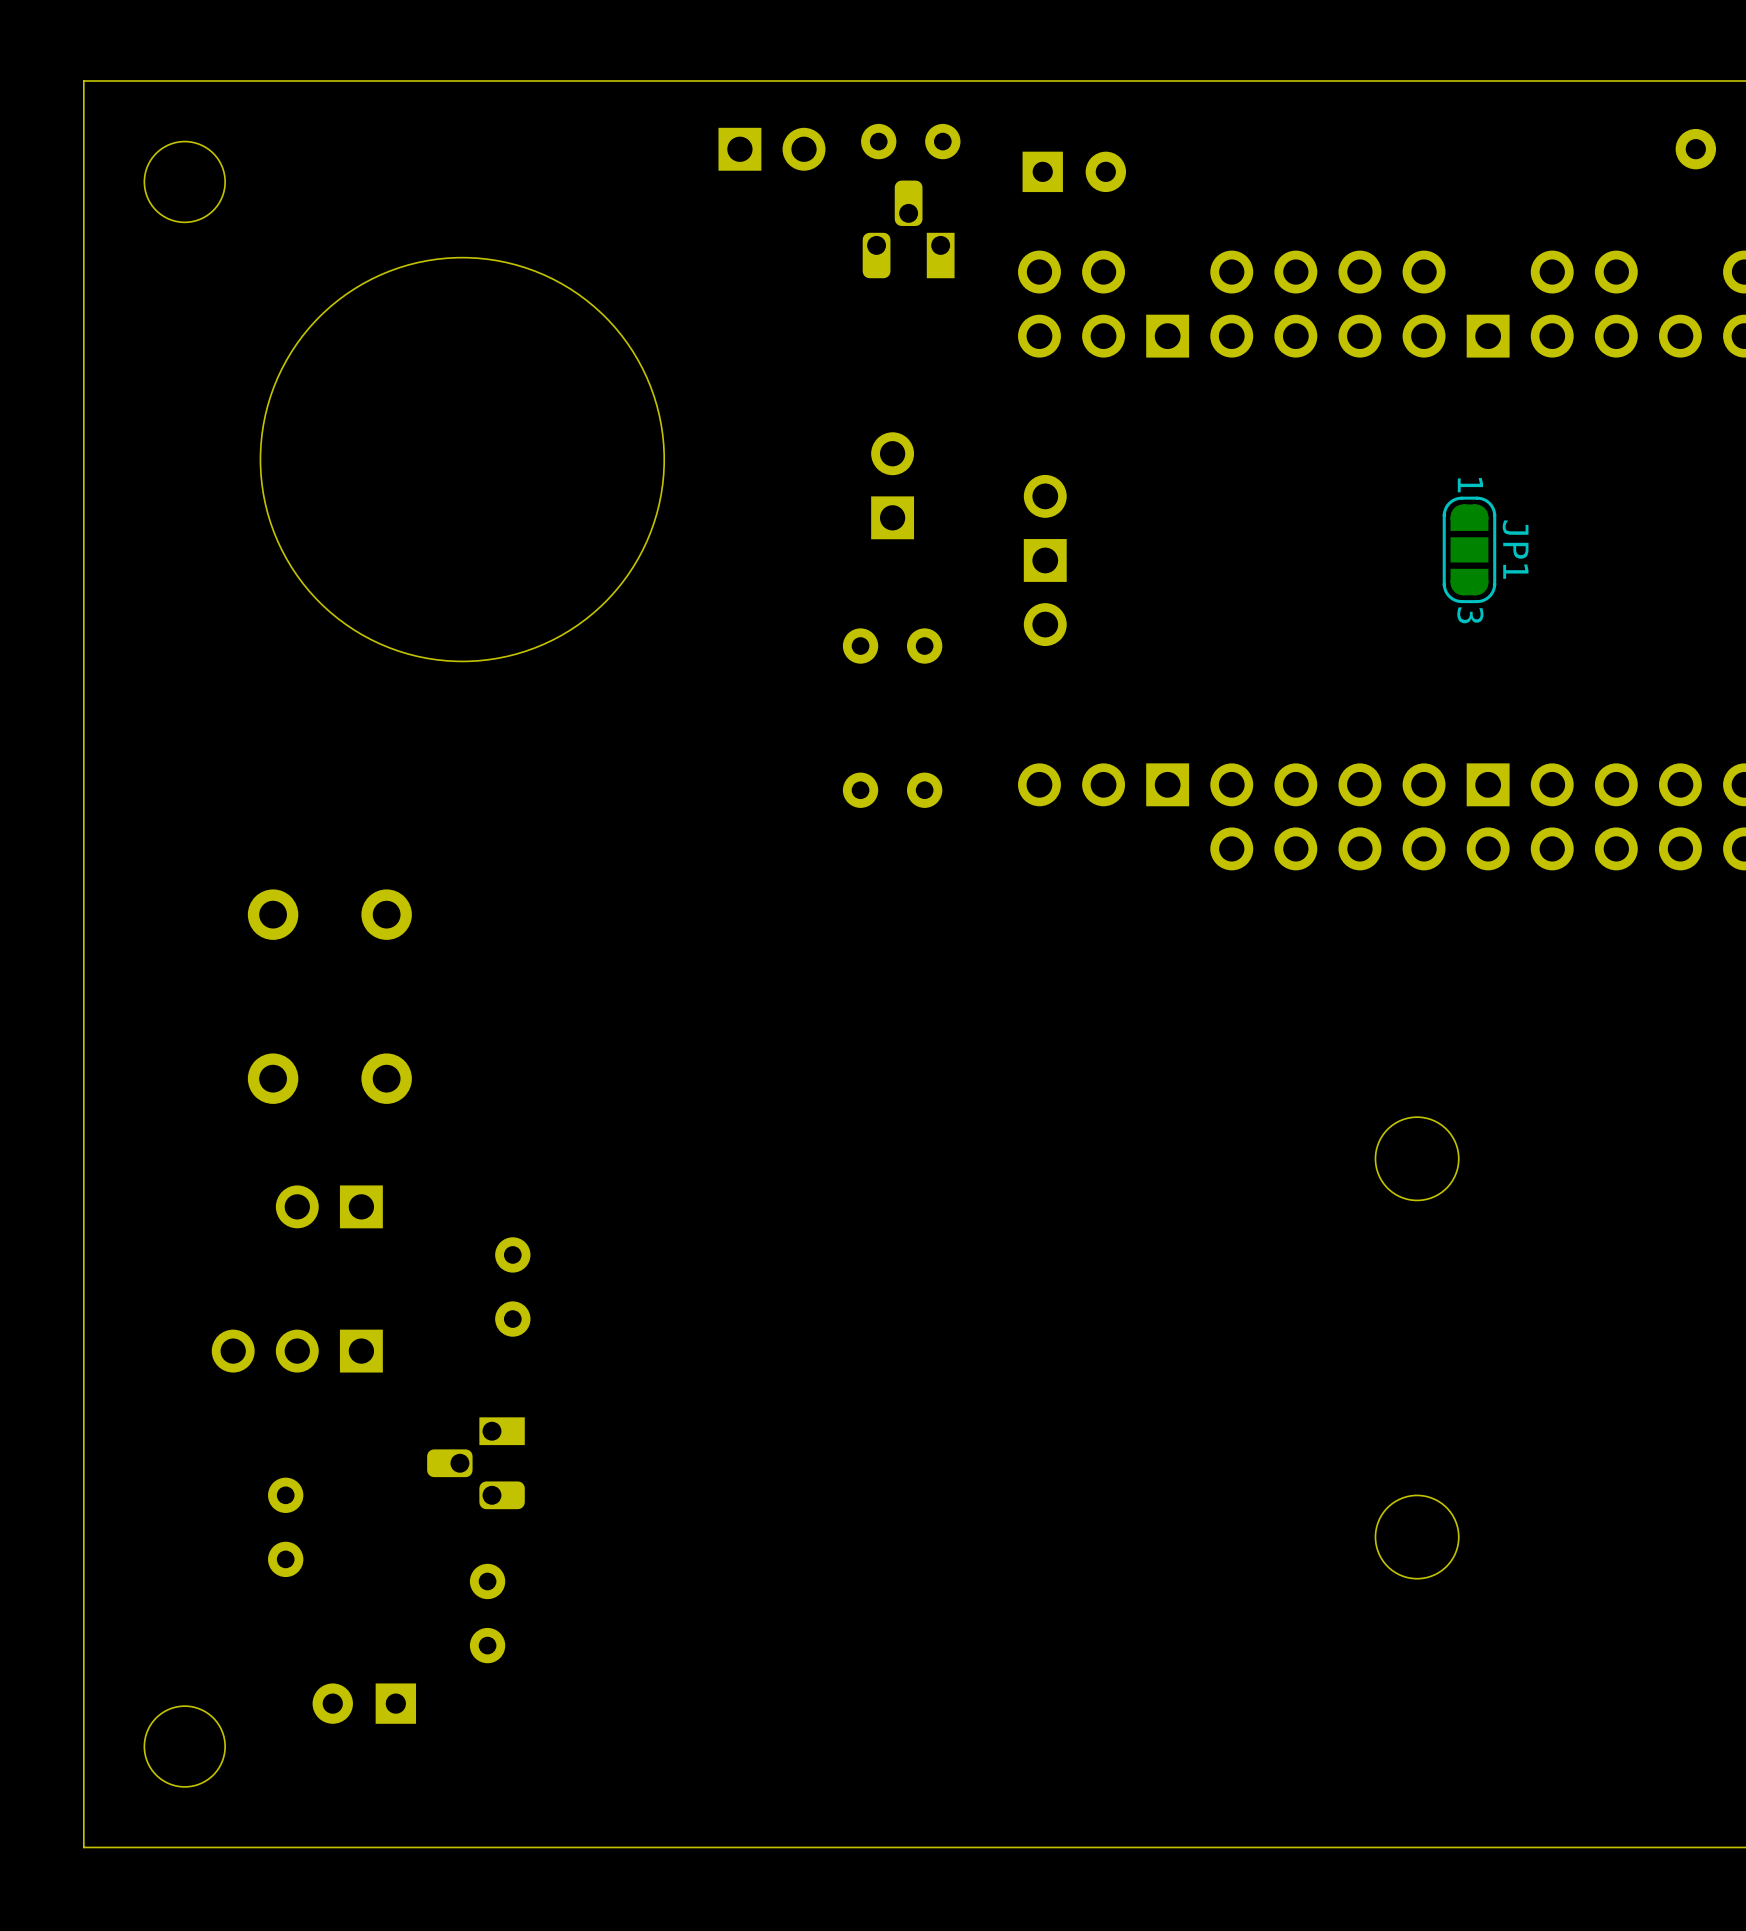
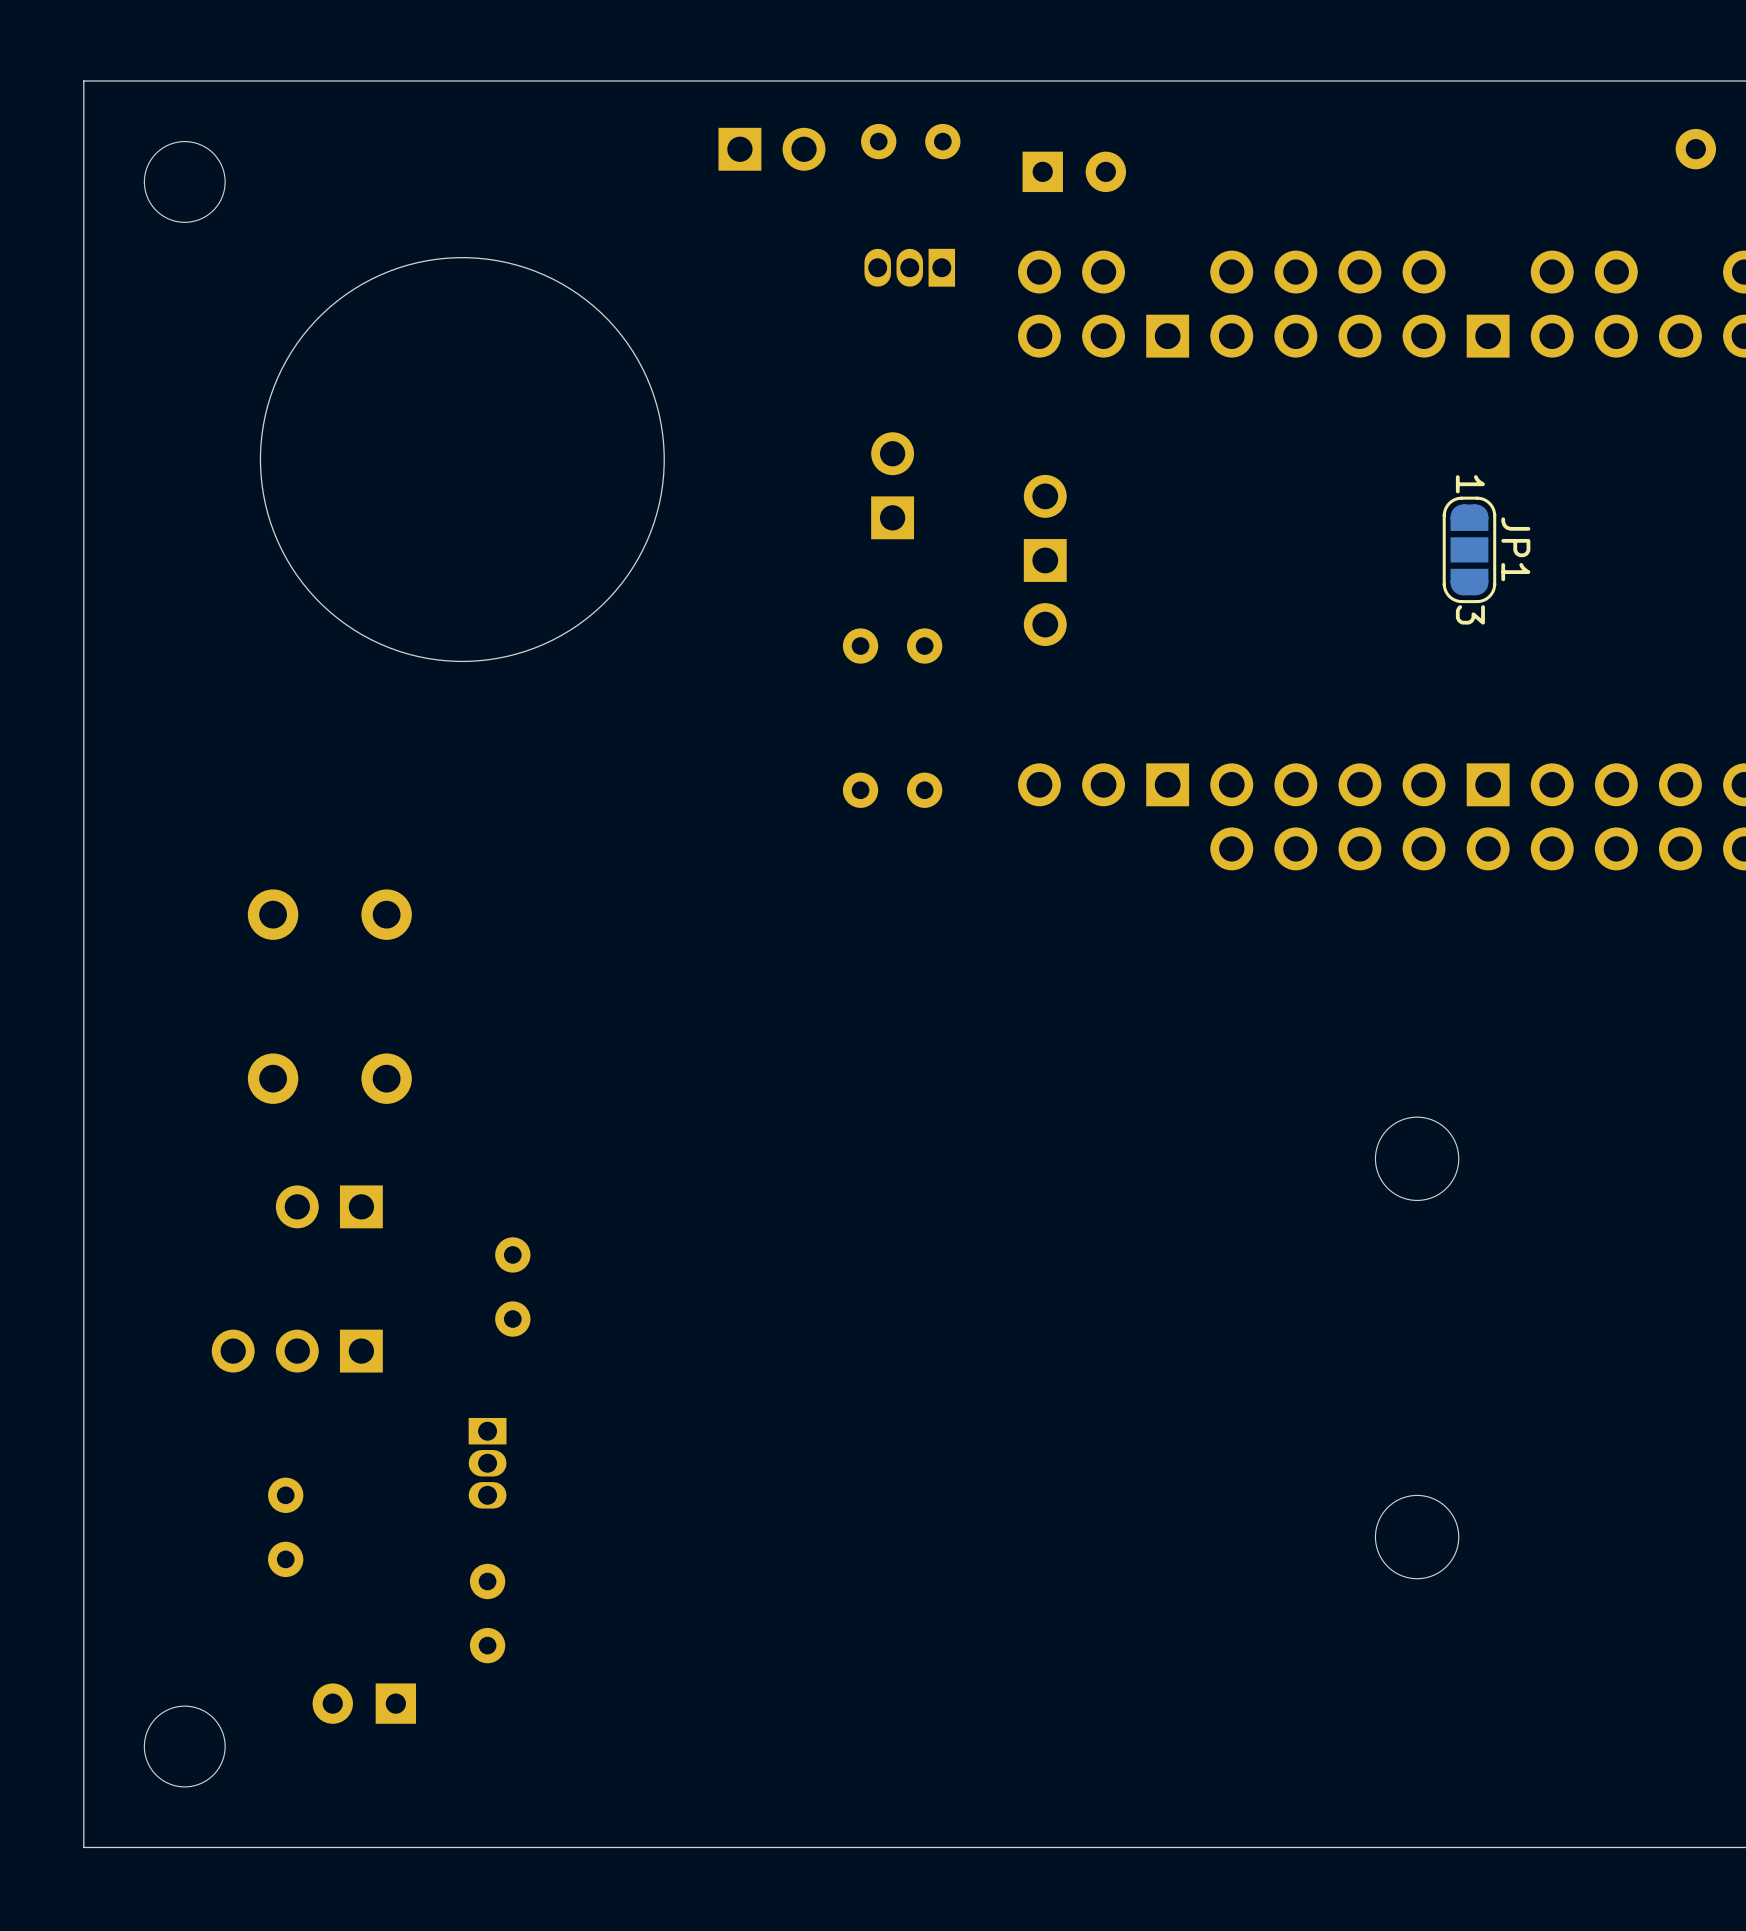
part: (908, 229) -> none
part: none -> (909, 267)
part footprint: [427, 1417, 525, 1510] -> [468, 1417, 507, 1509]

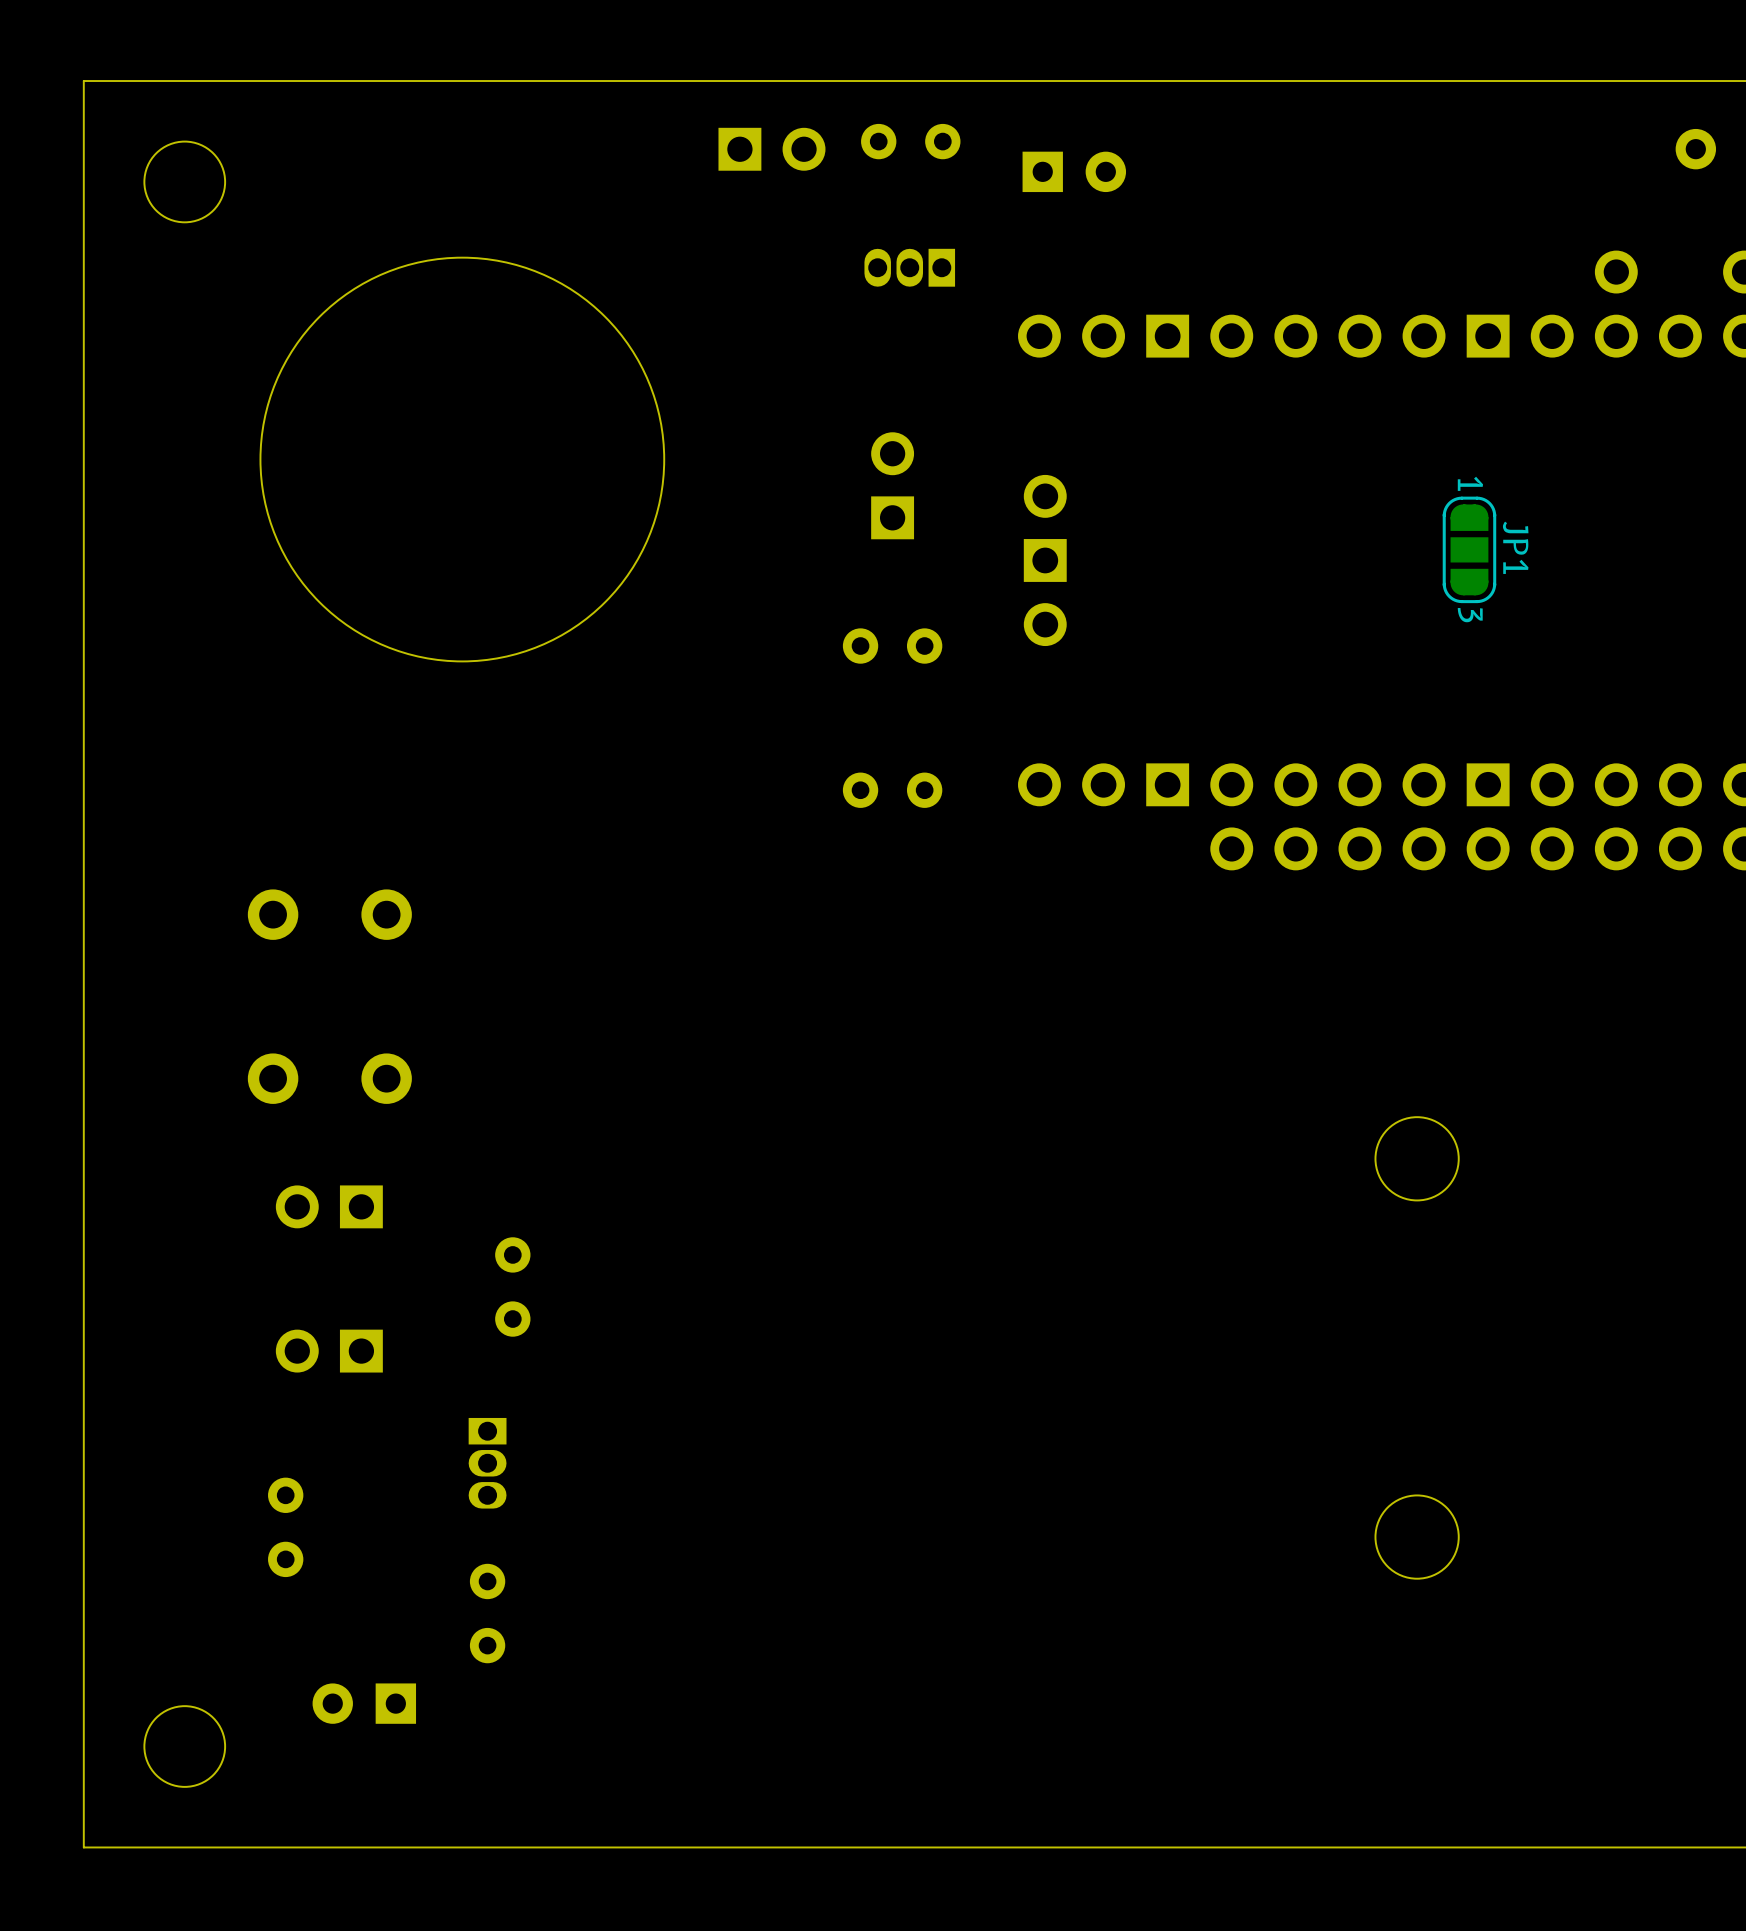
part: (1071, 272) -> none
part: (1327, 272) -> none
part: (1552, 272) -> none
part: (297, 1351) -> none

